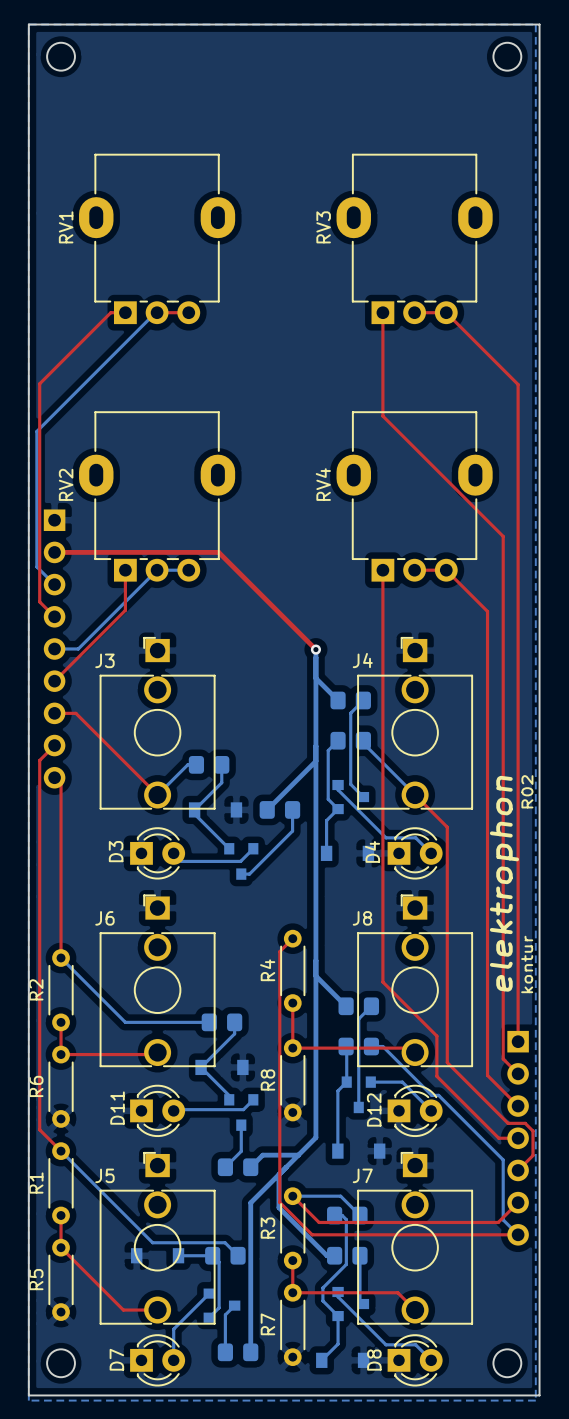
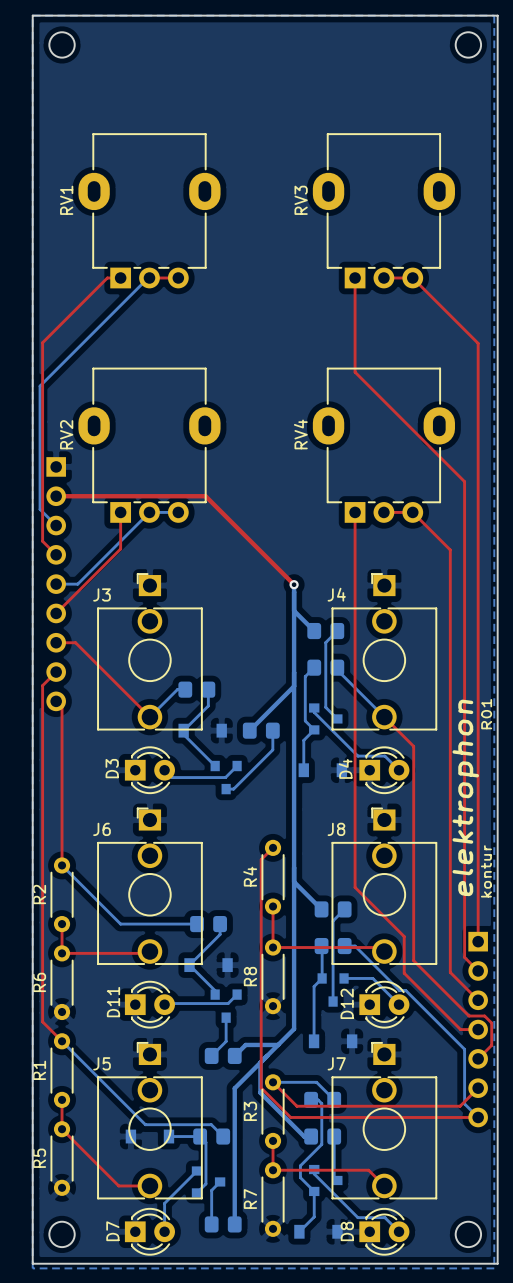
drawing shape: [489, 775, 534, 994] -> [452, 699, 493, 898]

